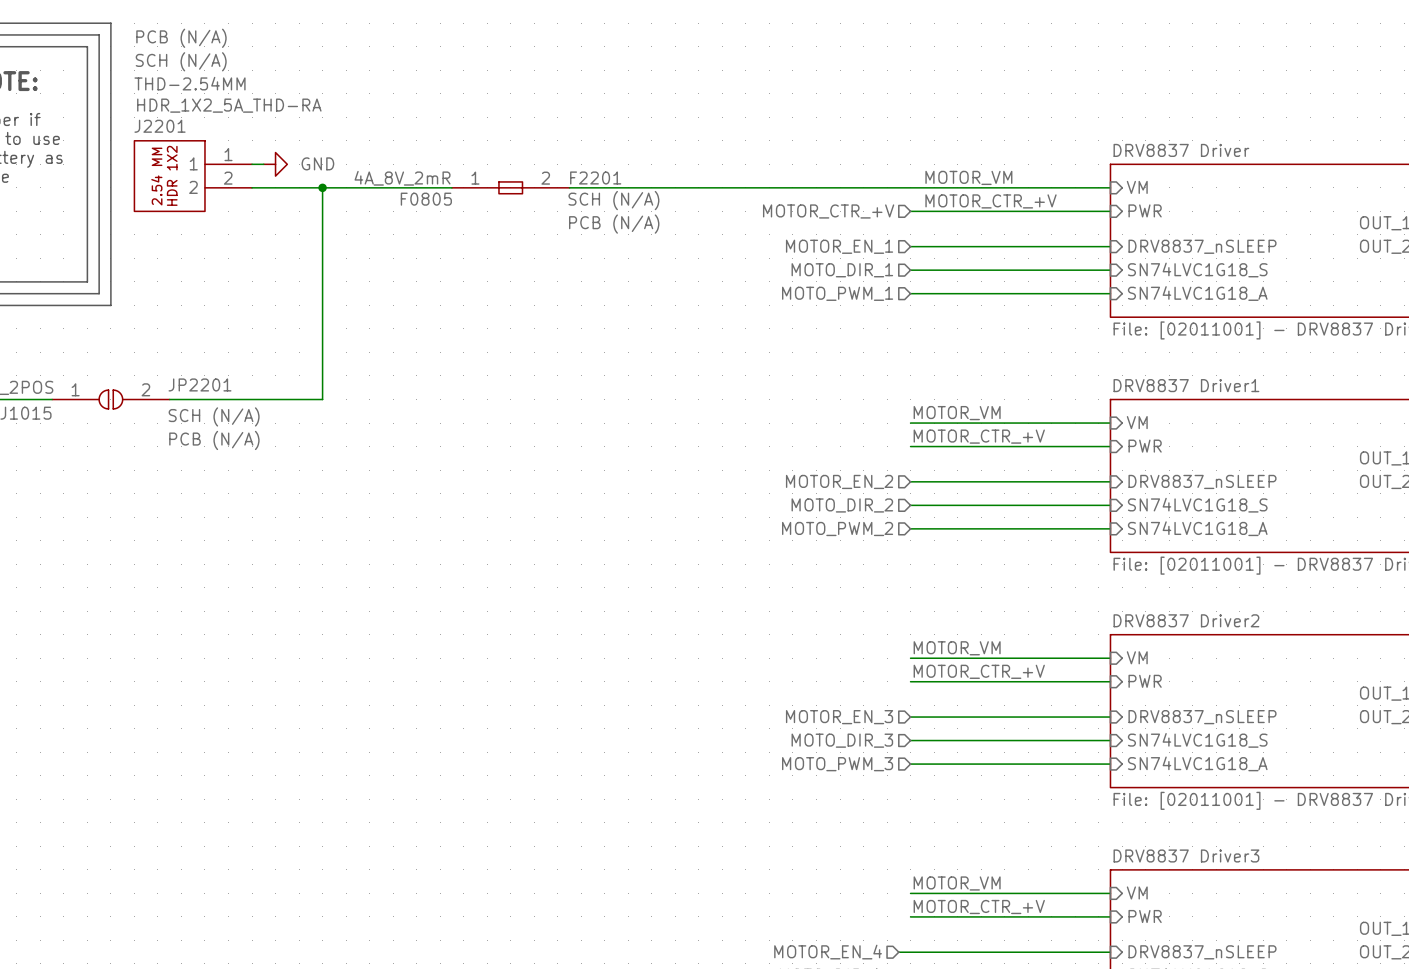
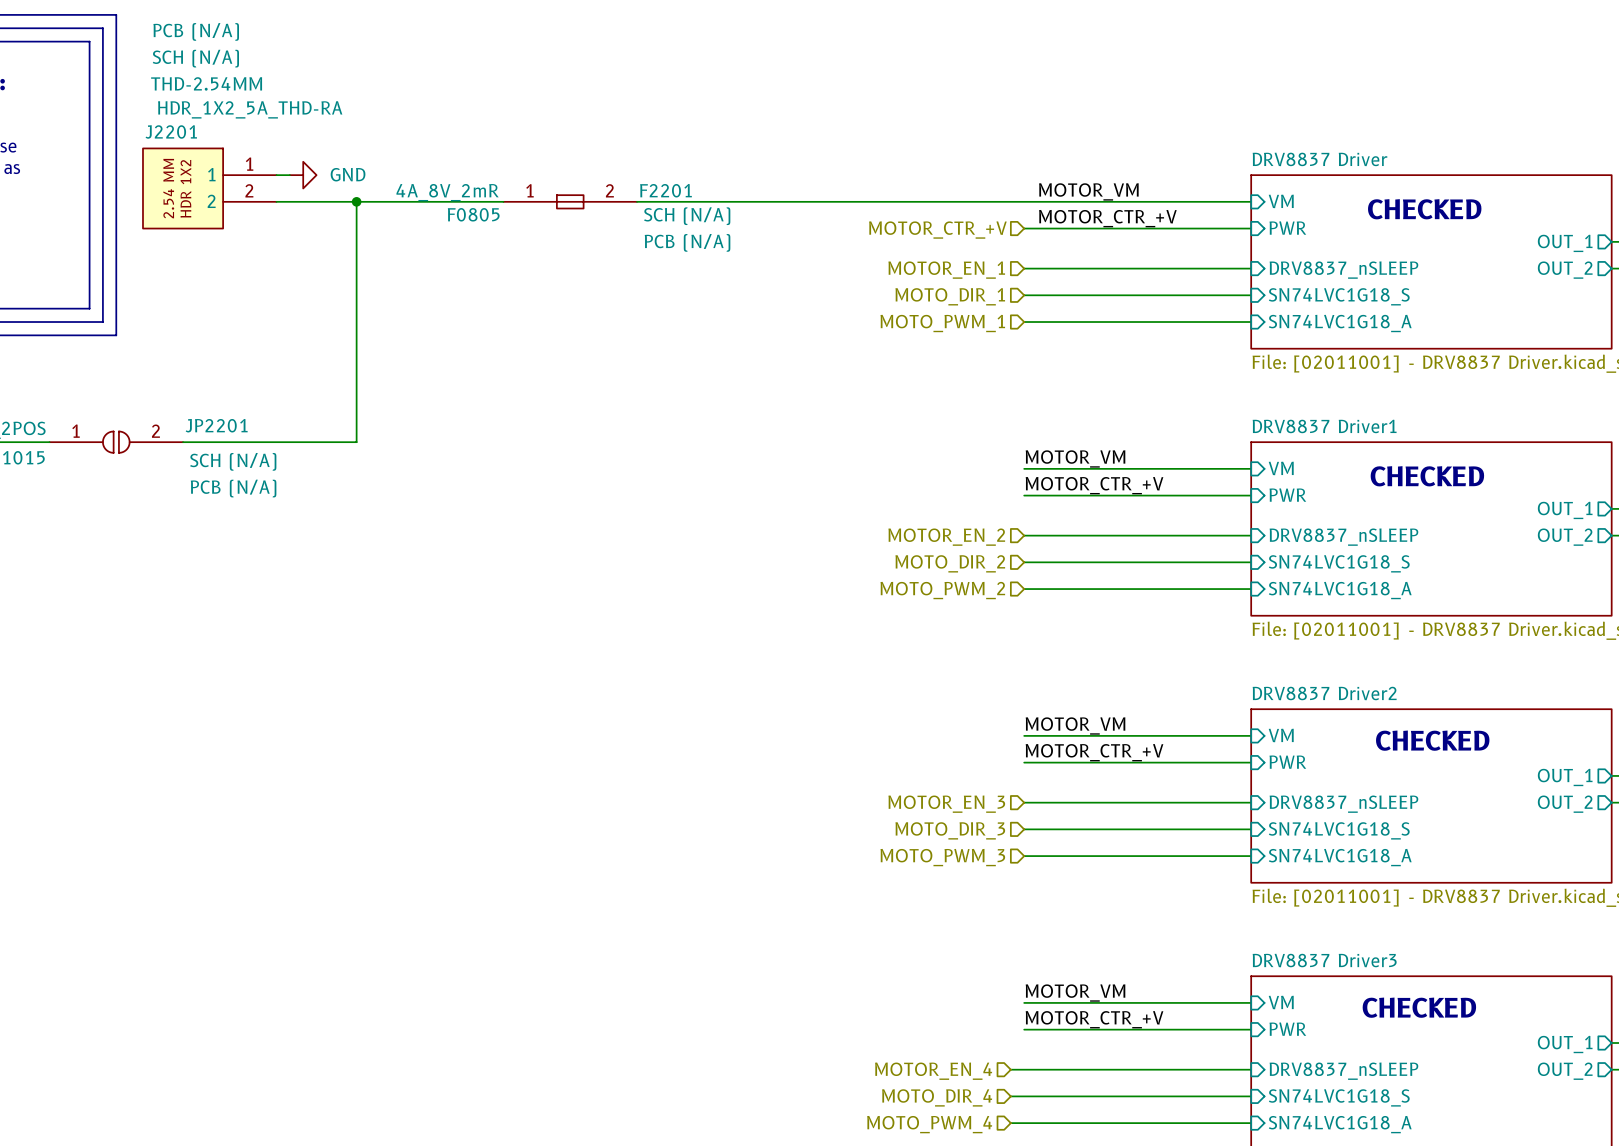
text: none -> CHECKED (1424, 209)
text: none -> CHECKED (1427, 476)
text: none -> CHECKED (1432, 740)
text: none -> CHECKED (1419, 1007)

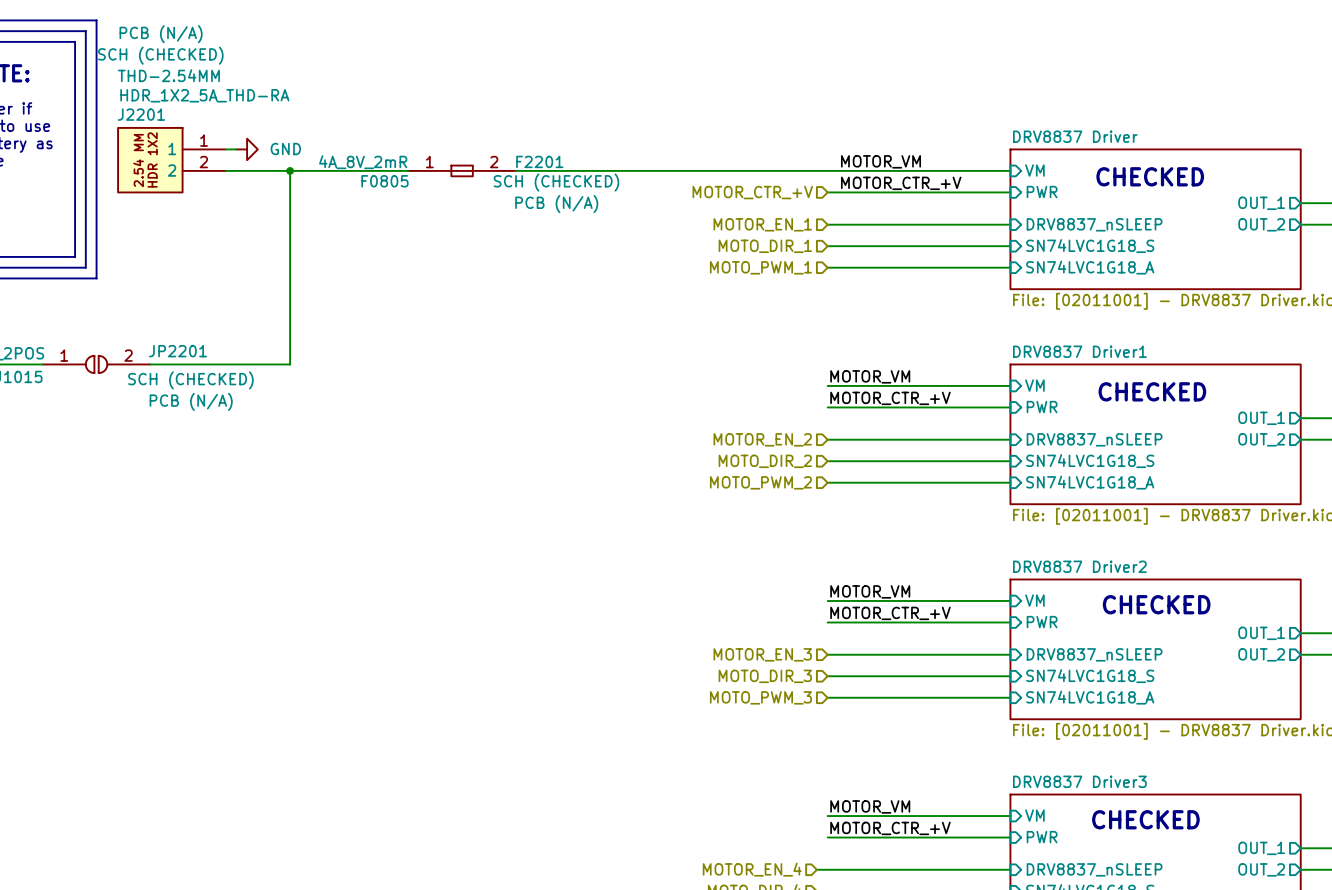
J2201 text: SCH (N/A) (195, 58) -> SCH (CHECKED) (160, 55)
F2201 text: SCH (N/A) (687, 216) -> SCH (CHECKED) (556, 182)
JP2201 text: SCH (N/A) (233, 461) -> SCH (CHECKED) (190, 380)

